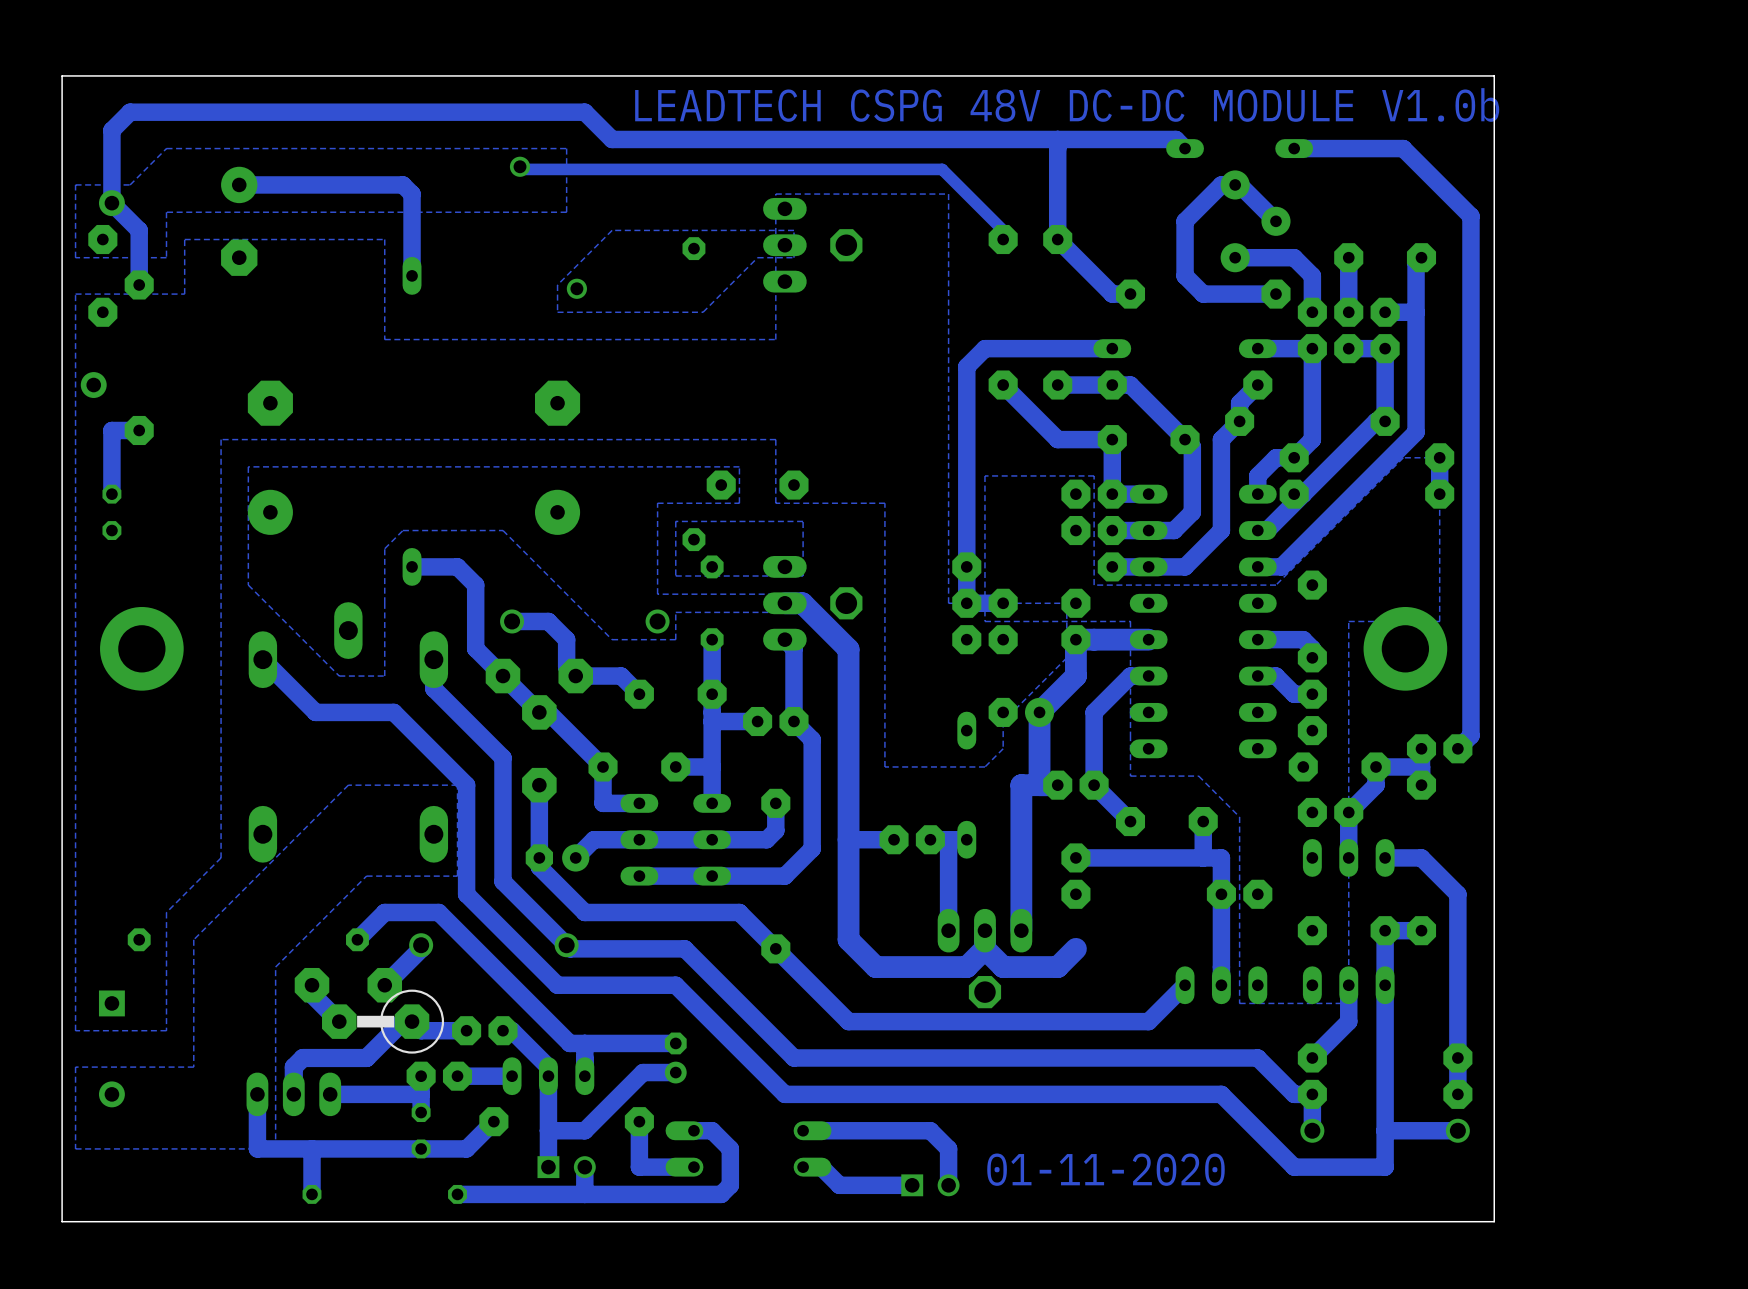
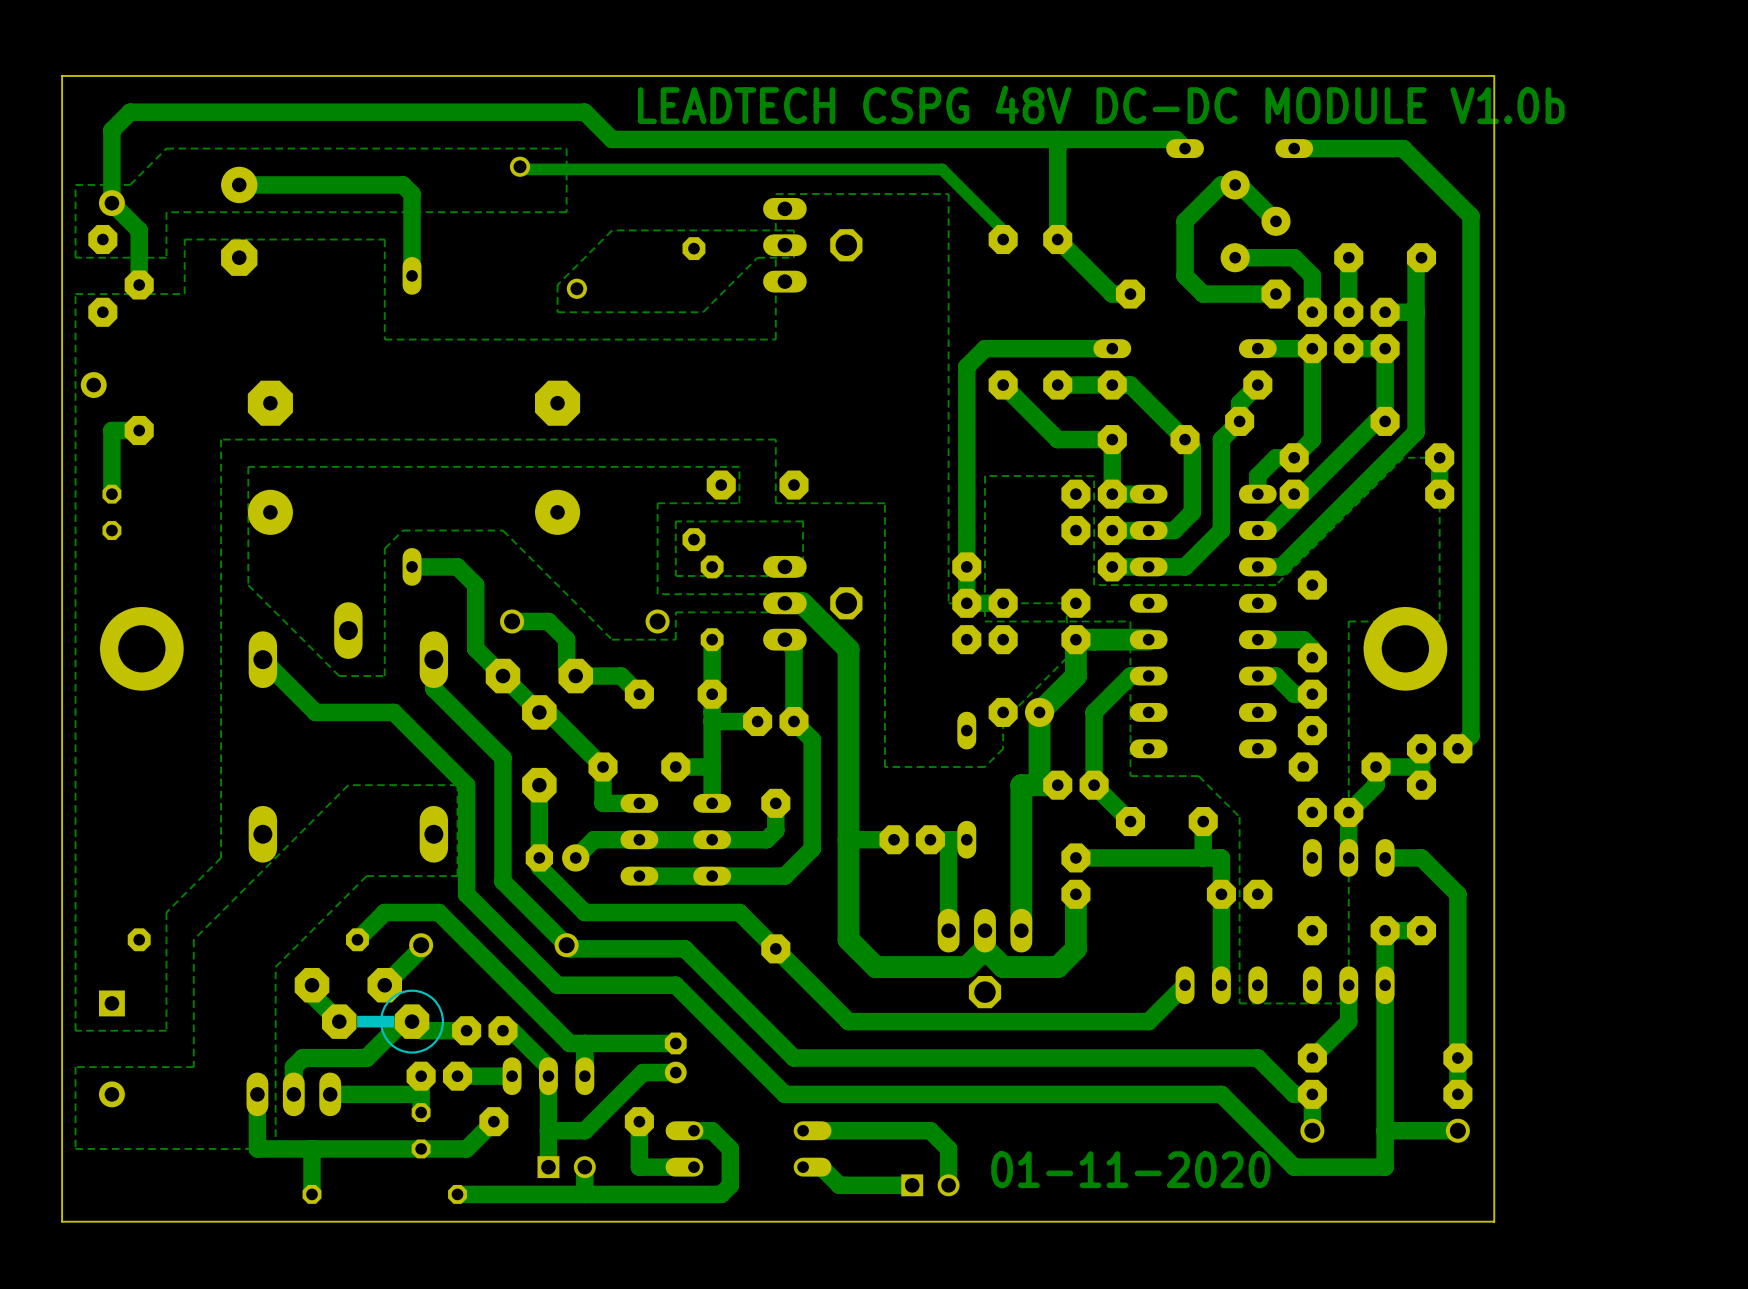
track: none -> (1075, 894) (1075, 948)

